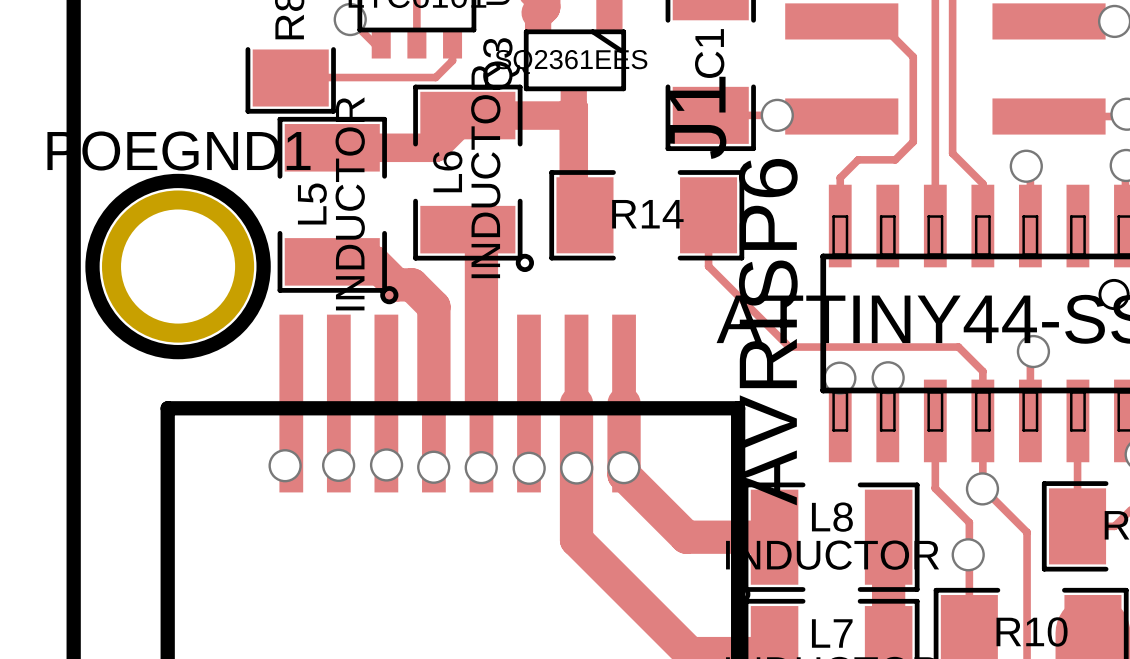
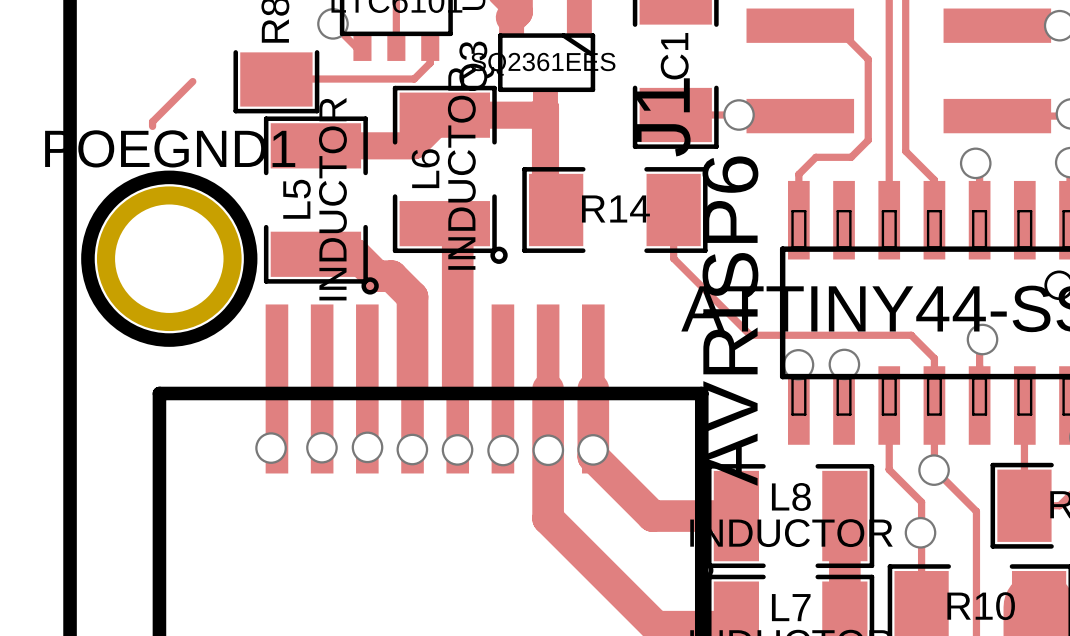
track: none -> (192, 81) (152, 121) (152, 126)

